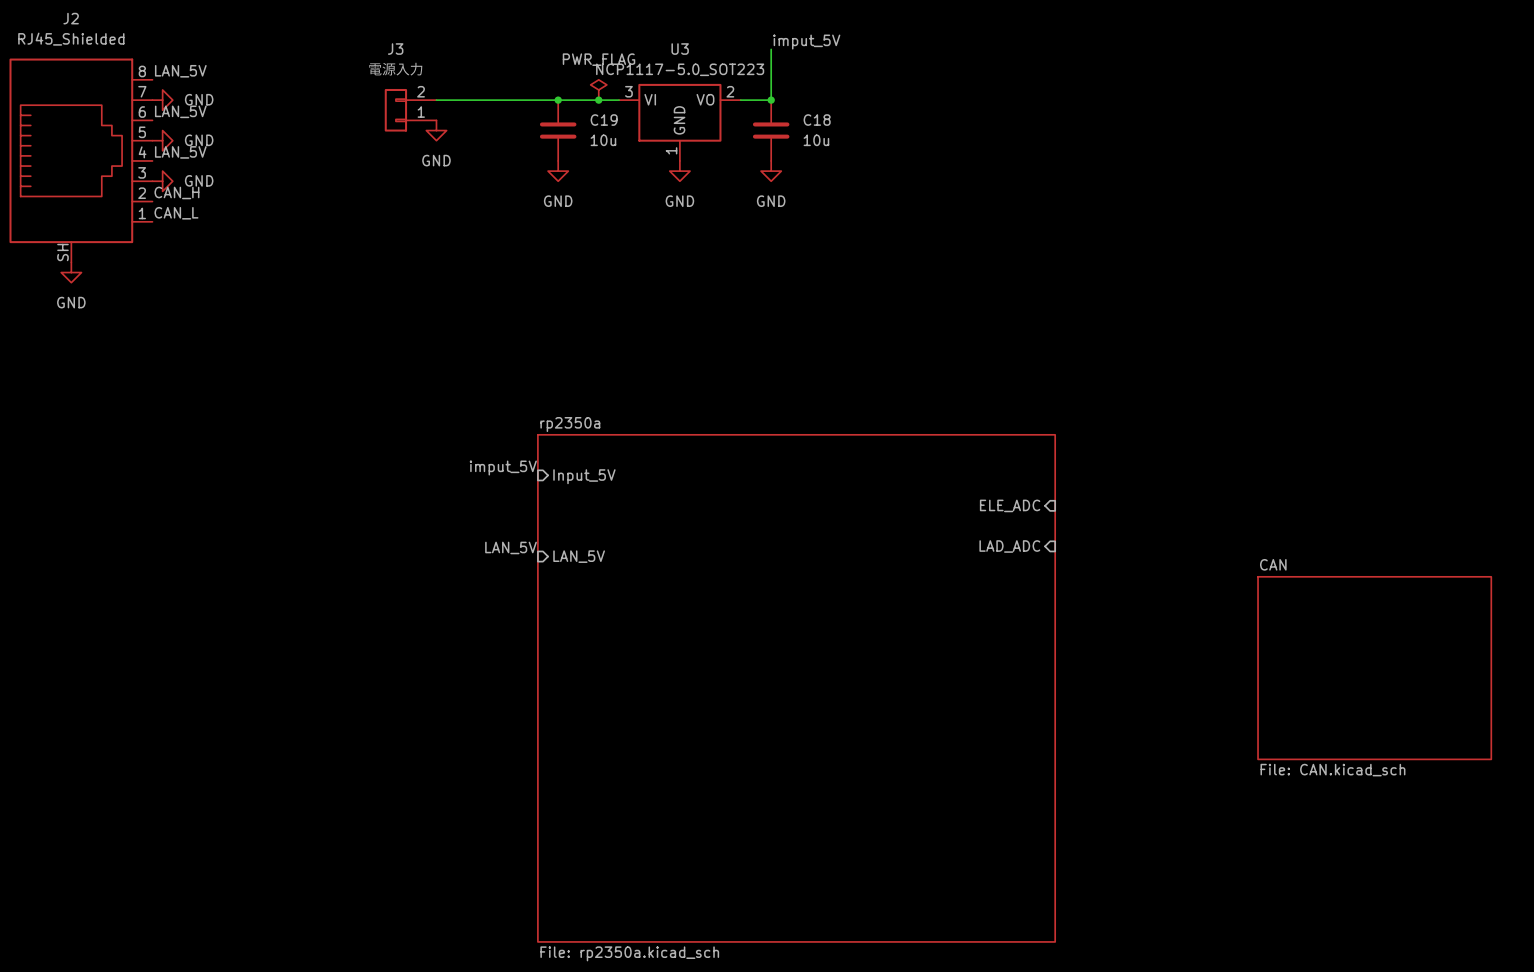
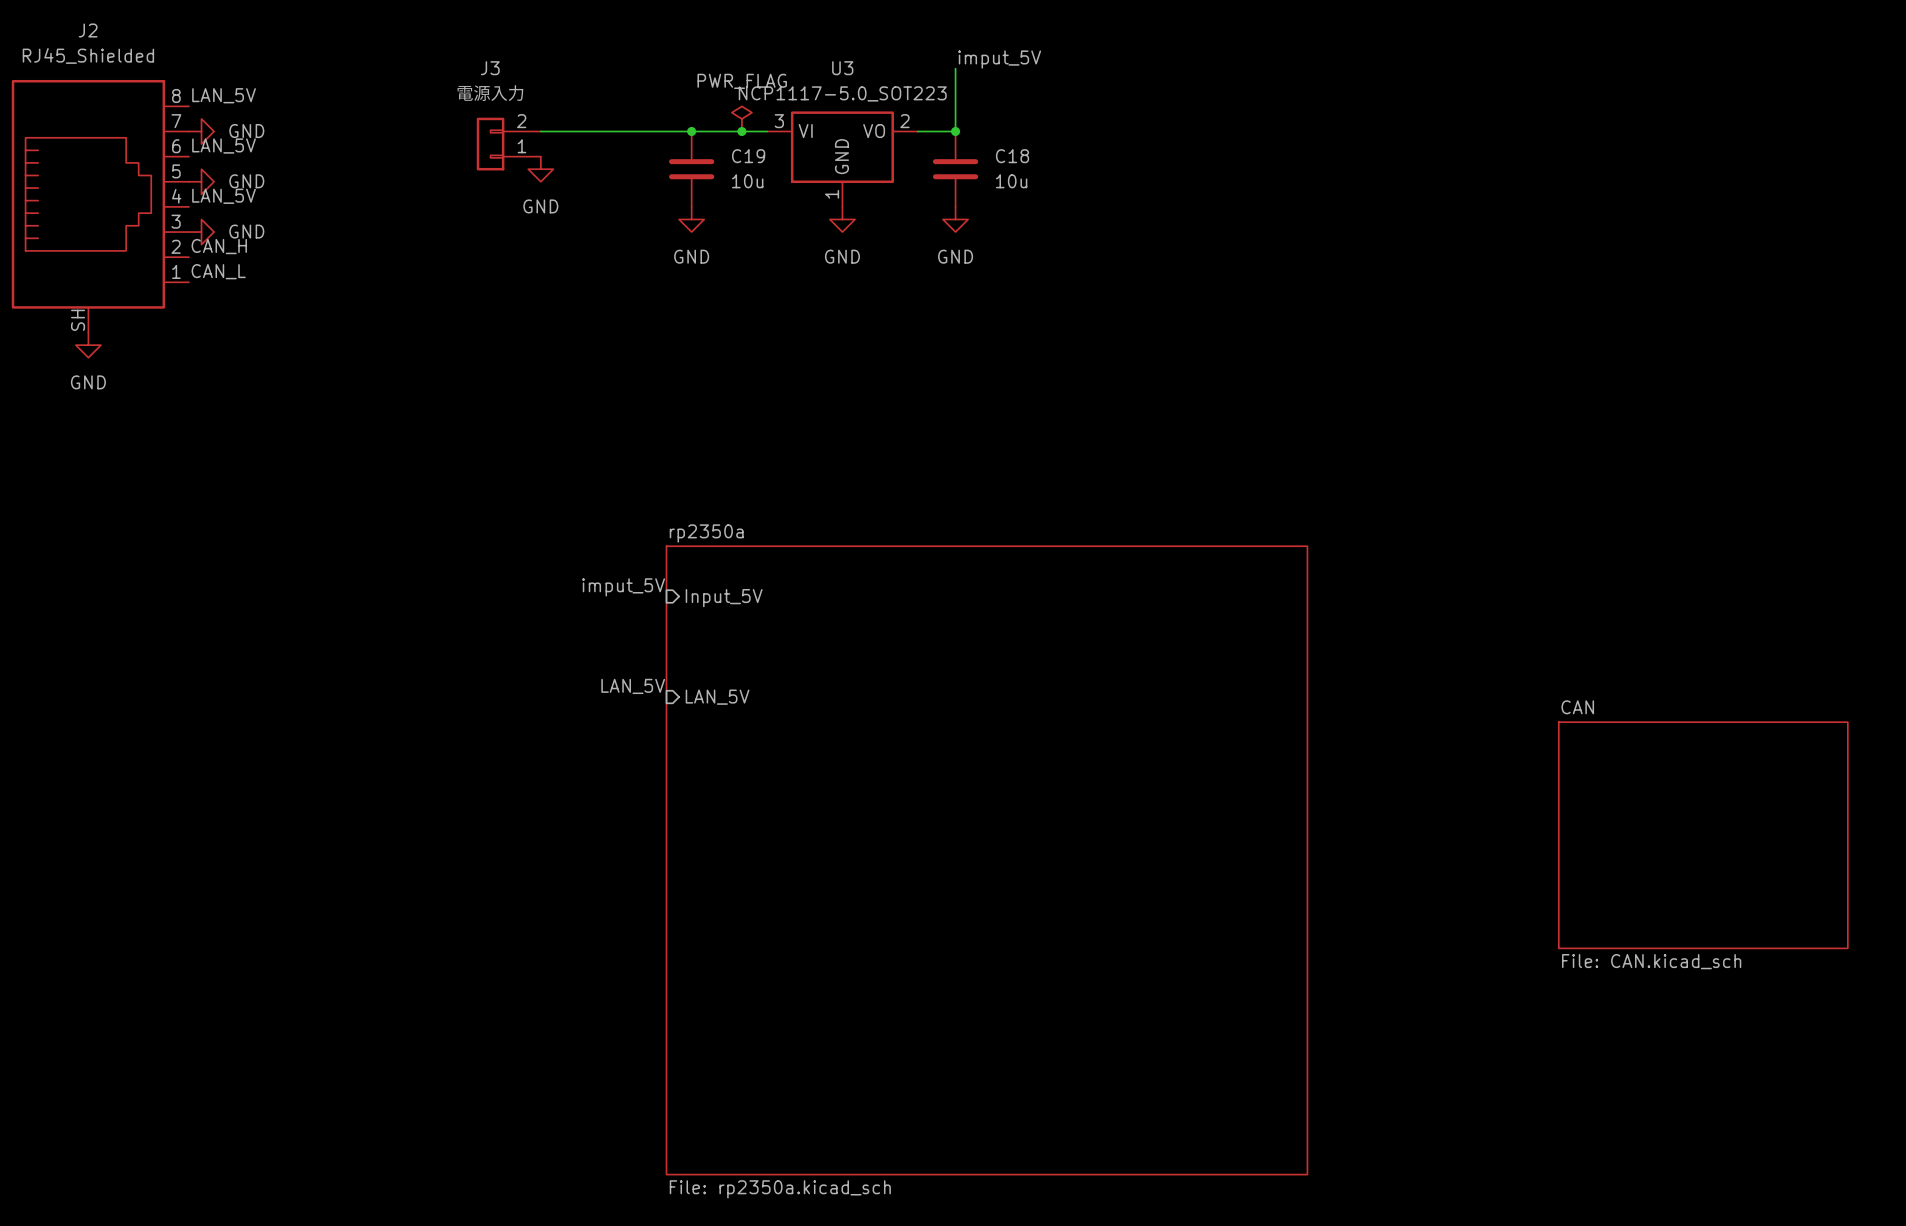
sheet pin: ELE_ADC (1010, 505) -> none
sheet pin: LAD_ADC (1009, 546) -> none

